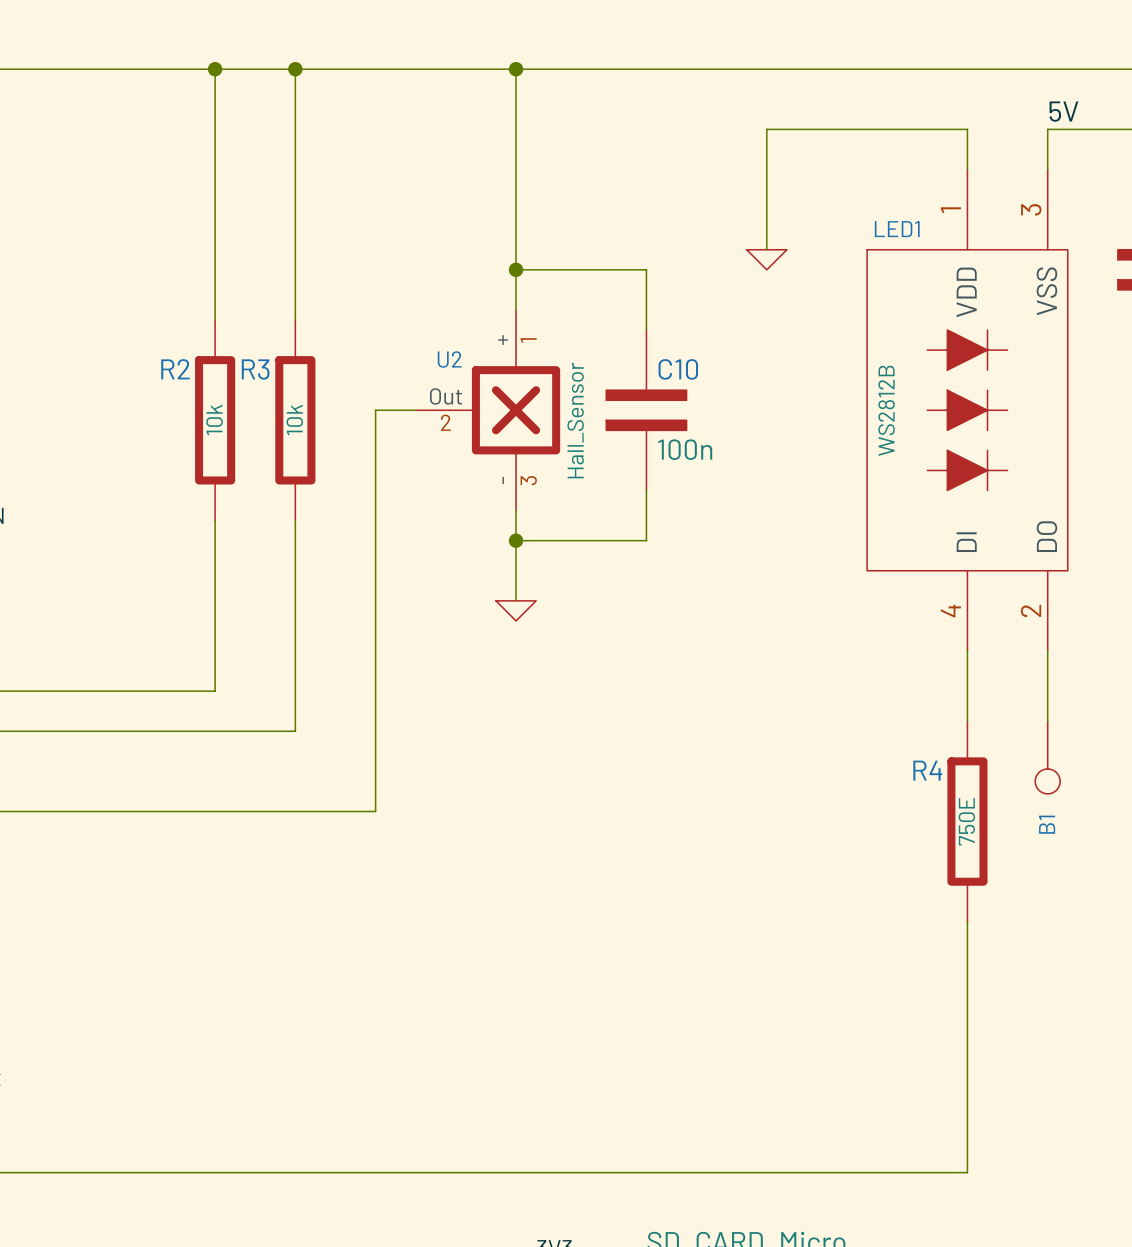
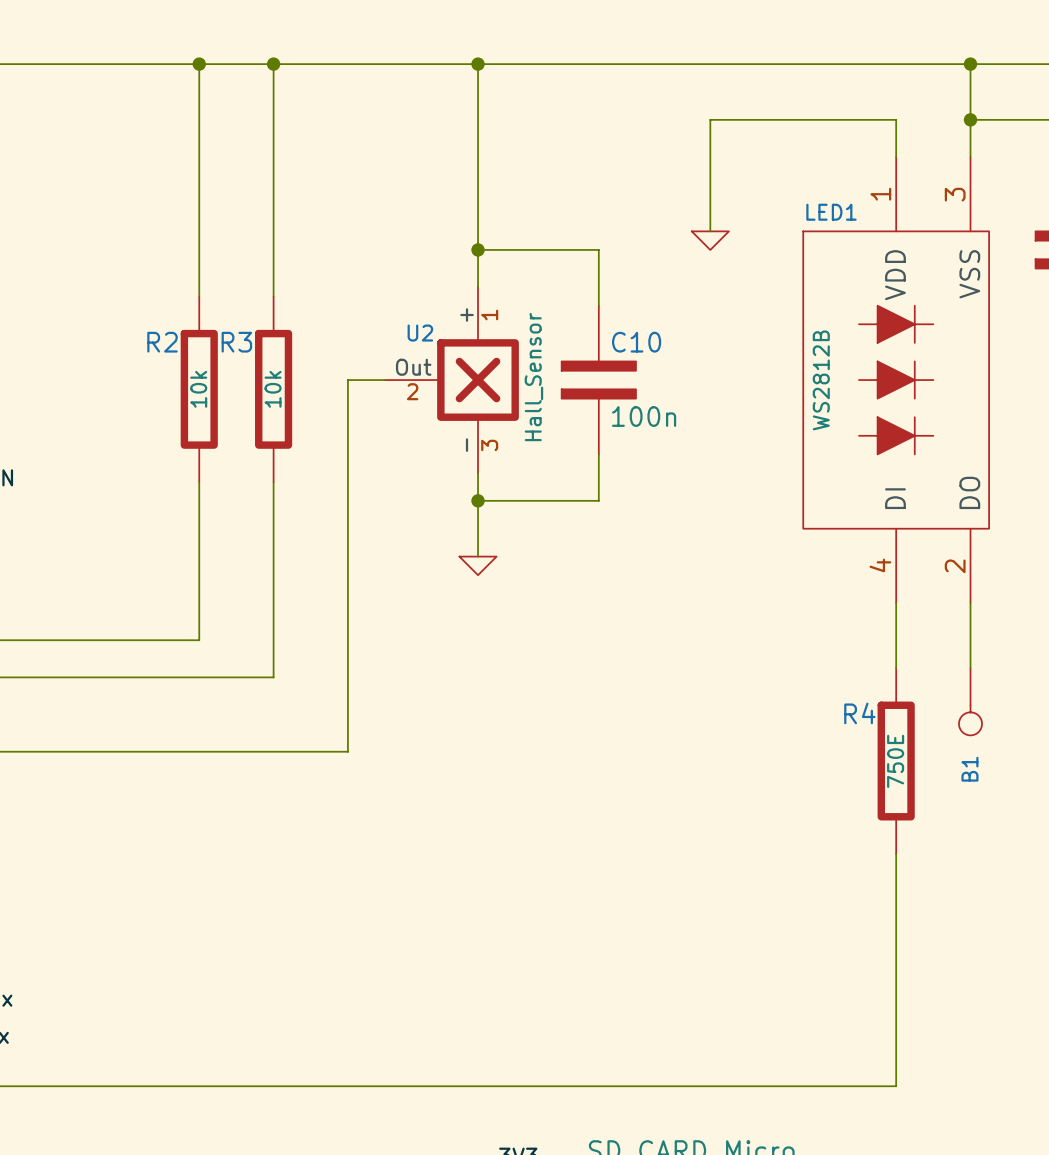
wire: none -> (970, 64) (970, 119)
junction: none -> (970, 64)
label: 5V (1063, 111) -> none
junction: none -> (970, 119)

